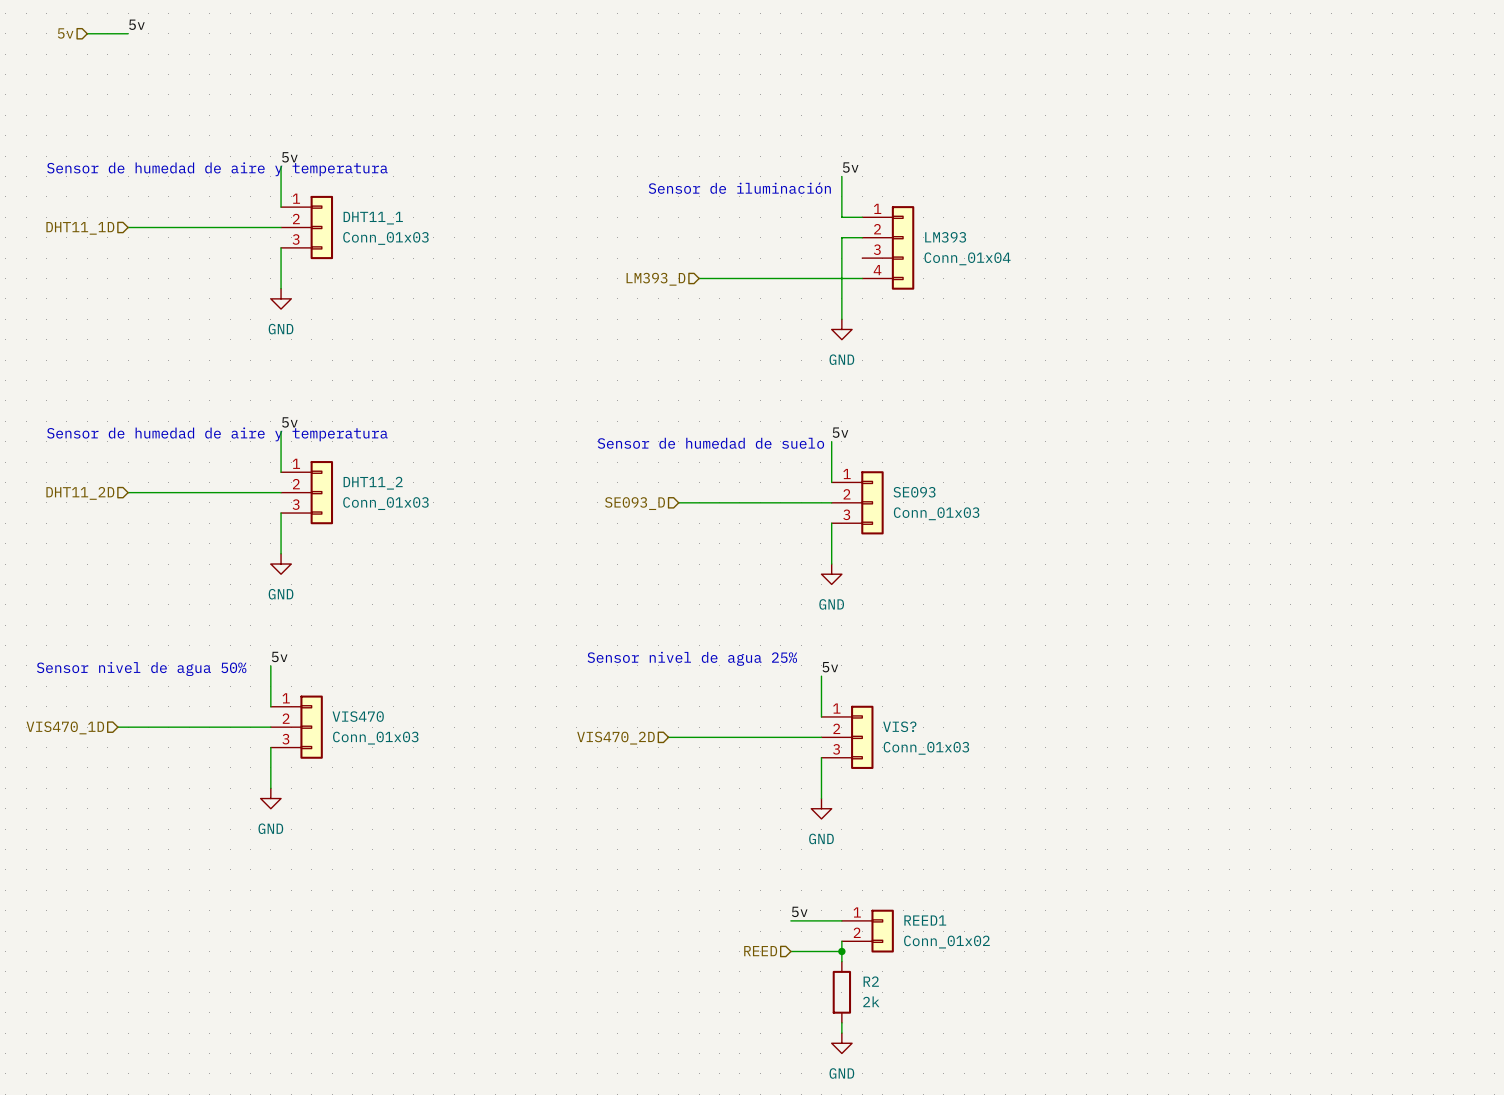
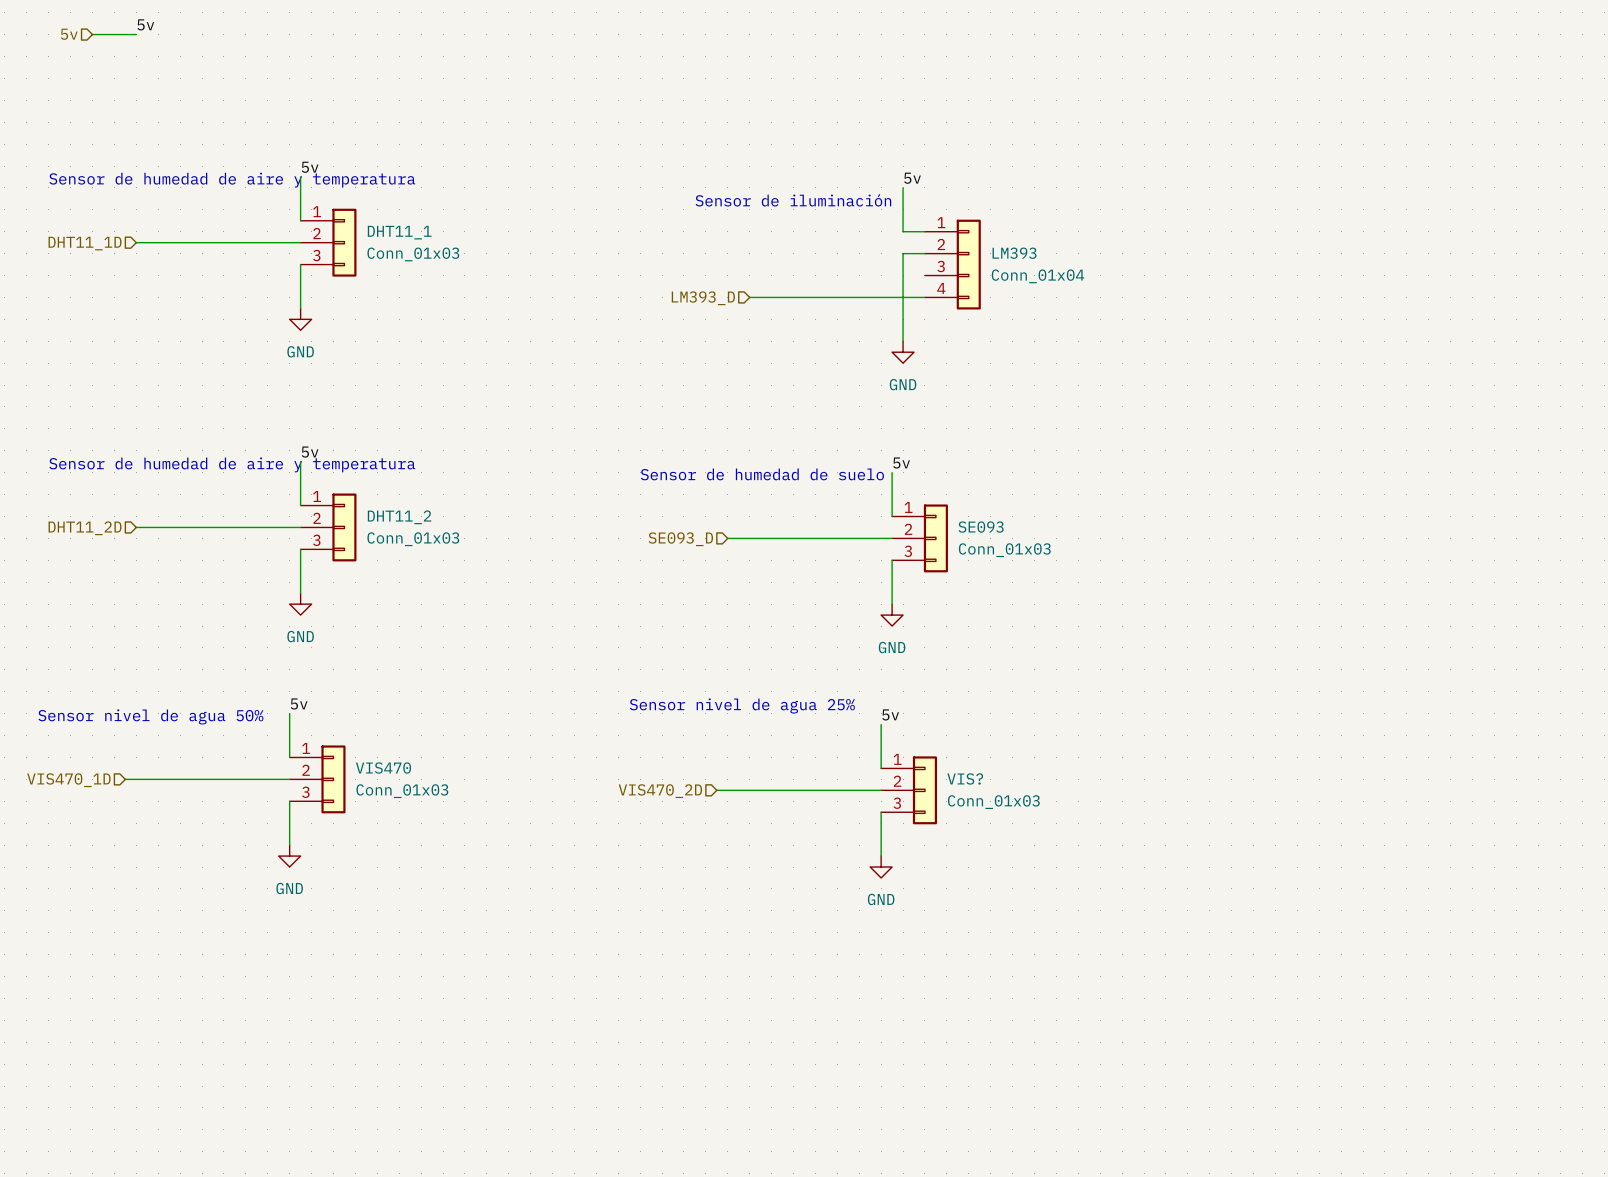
label: 5v (799, 911) -> none
wire: (790, 920) (841, 920) -> none
REED1: Conn_01x02 (867, 931) -> none
wire: (841, 941) (841, 961) -> none
hierarchical label: REED (760, 951) -> none
wire: (790, 951) (841, 951) -> none
junction: (841, 951) -> none
R2: 2k (841, 992) -> none
wire: (841, 1022) (841, 1033) -> none
power symbol: GND (841, 1043) -> none

